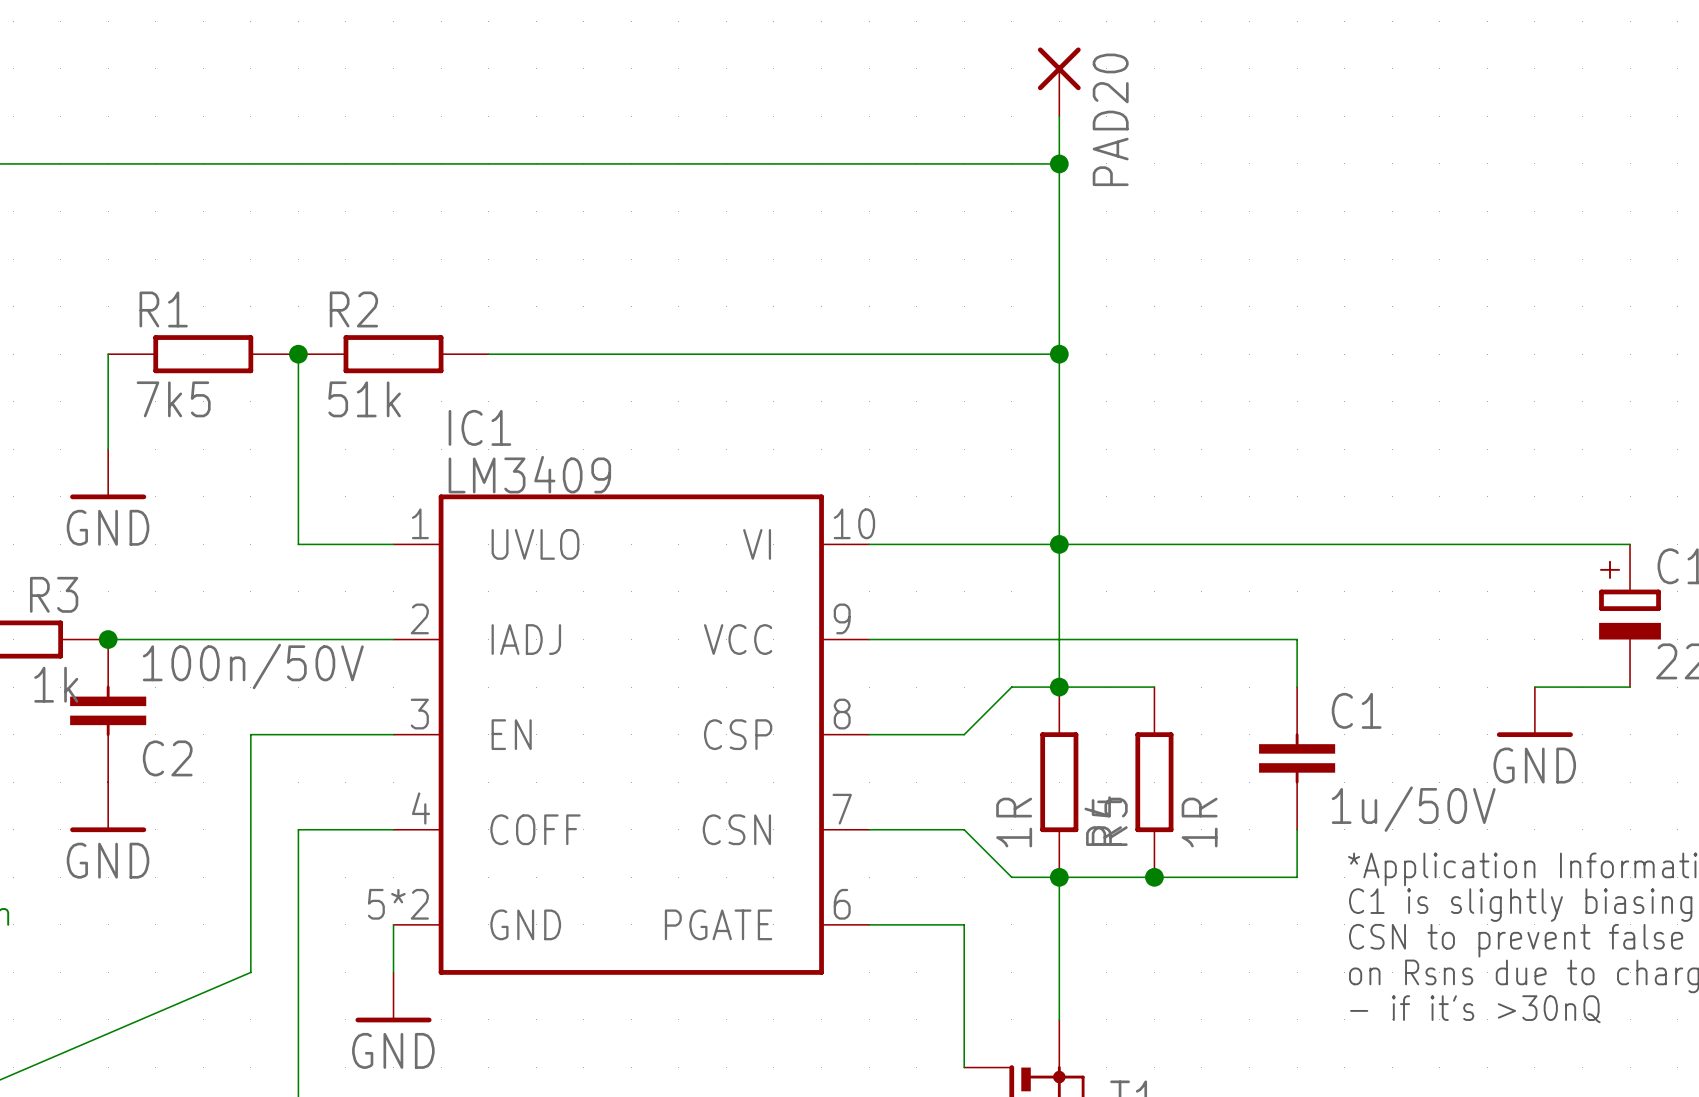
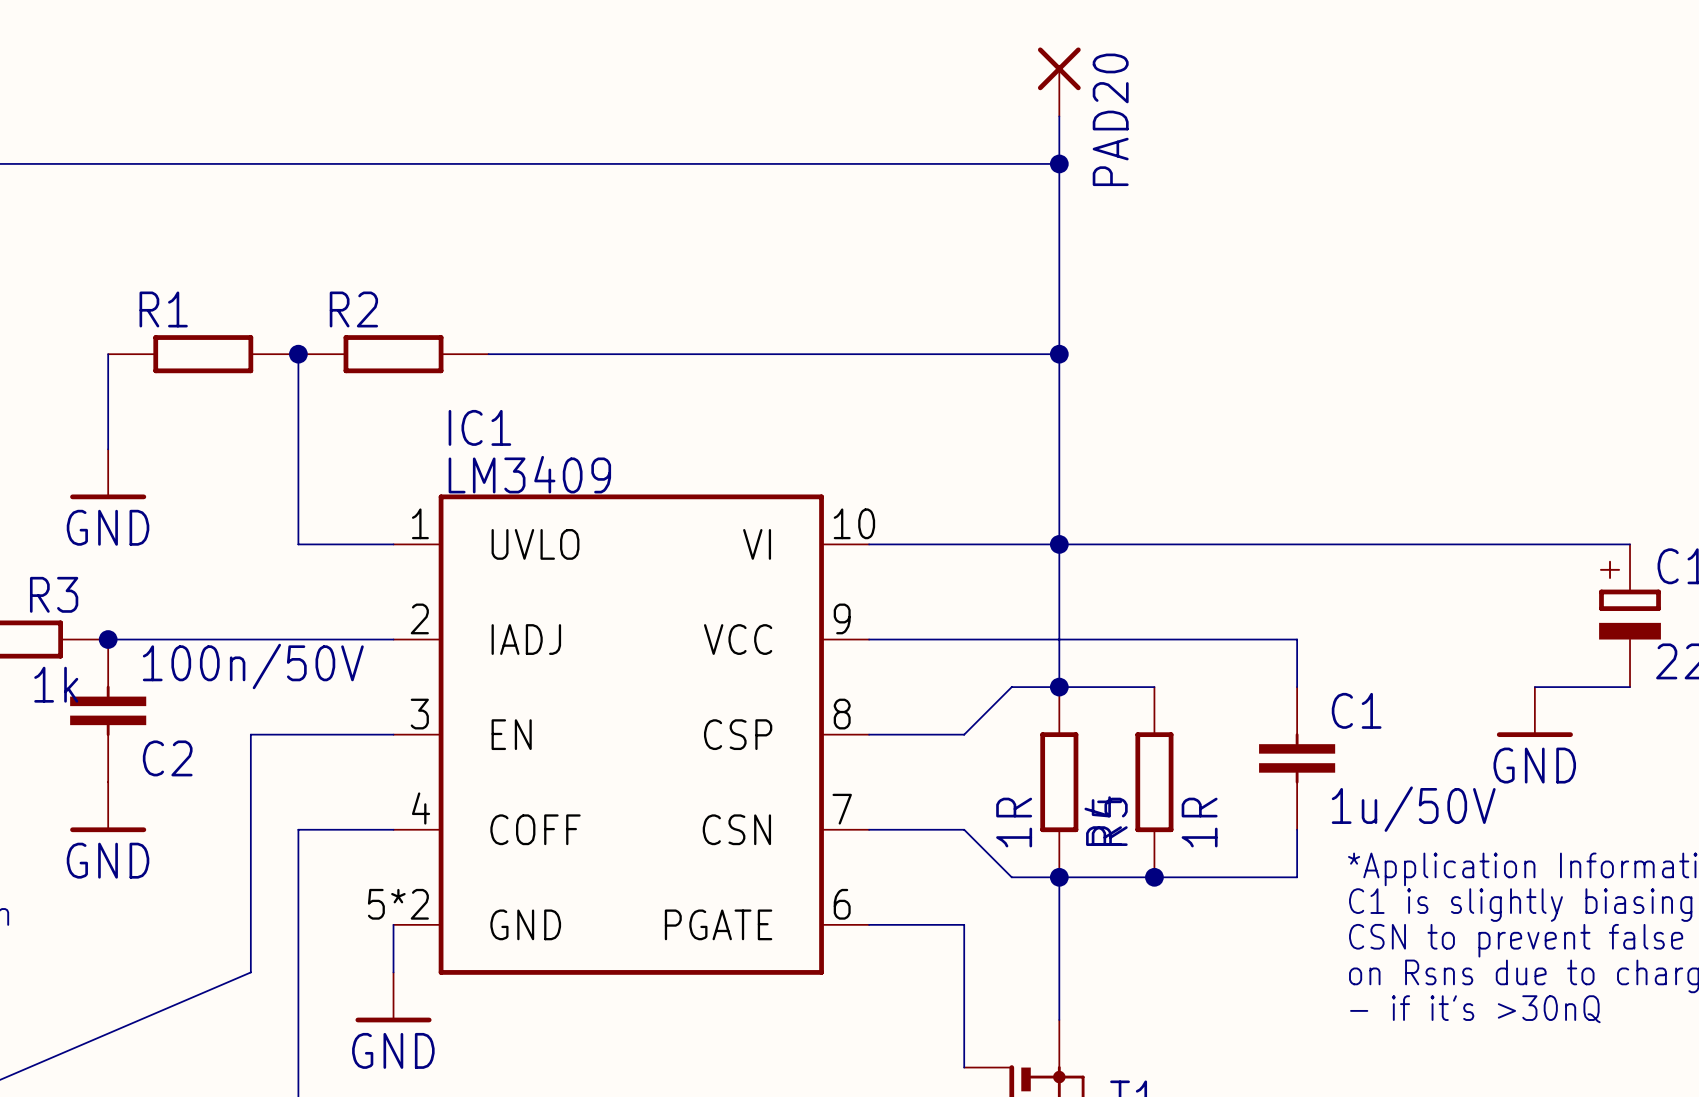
R1 value: 7k5 (173, 399) -> none
R2 value: 51k (364, 399) -> none

